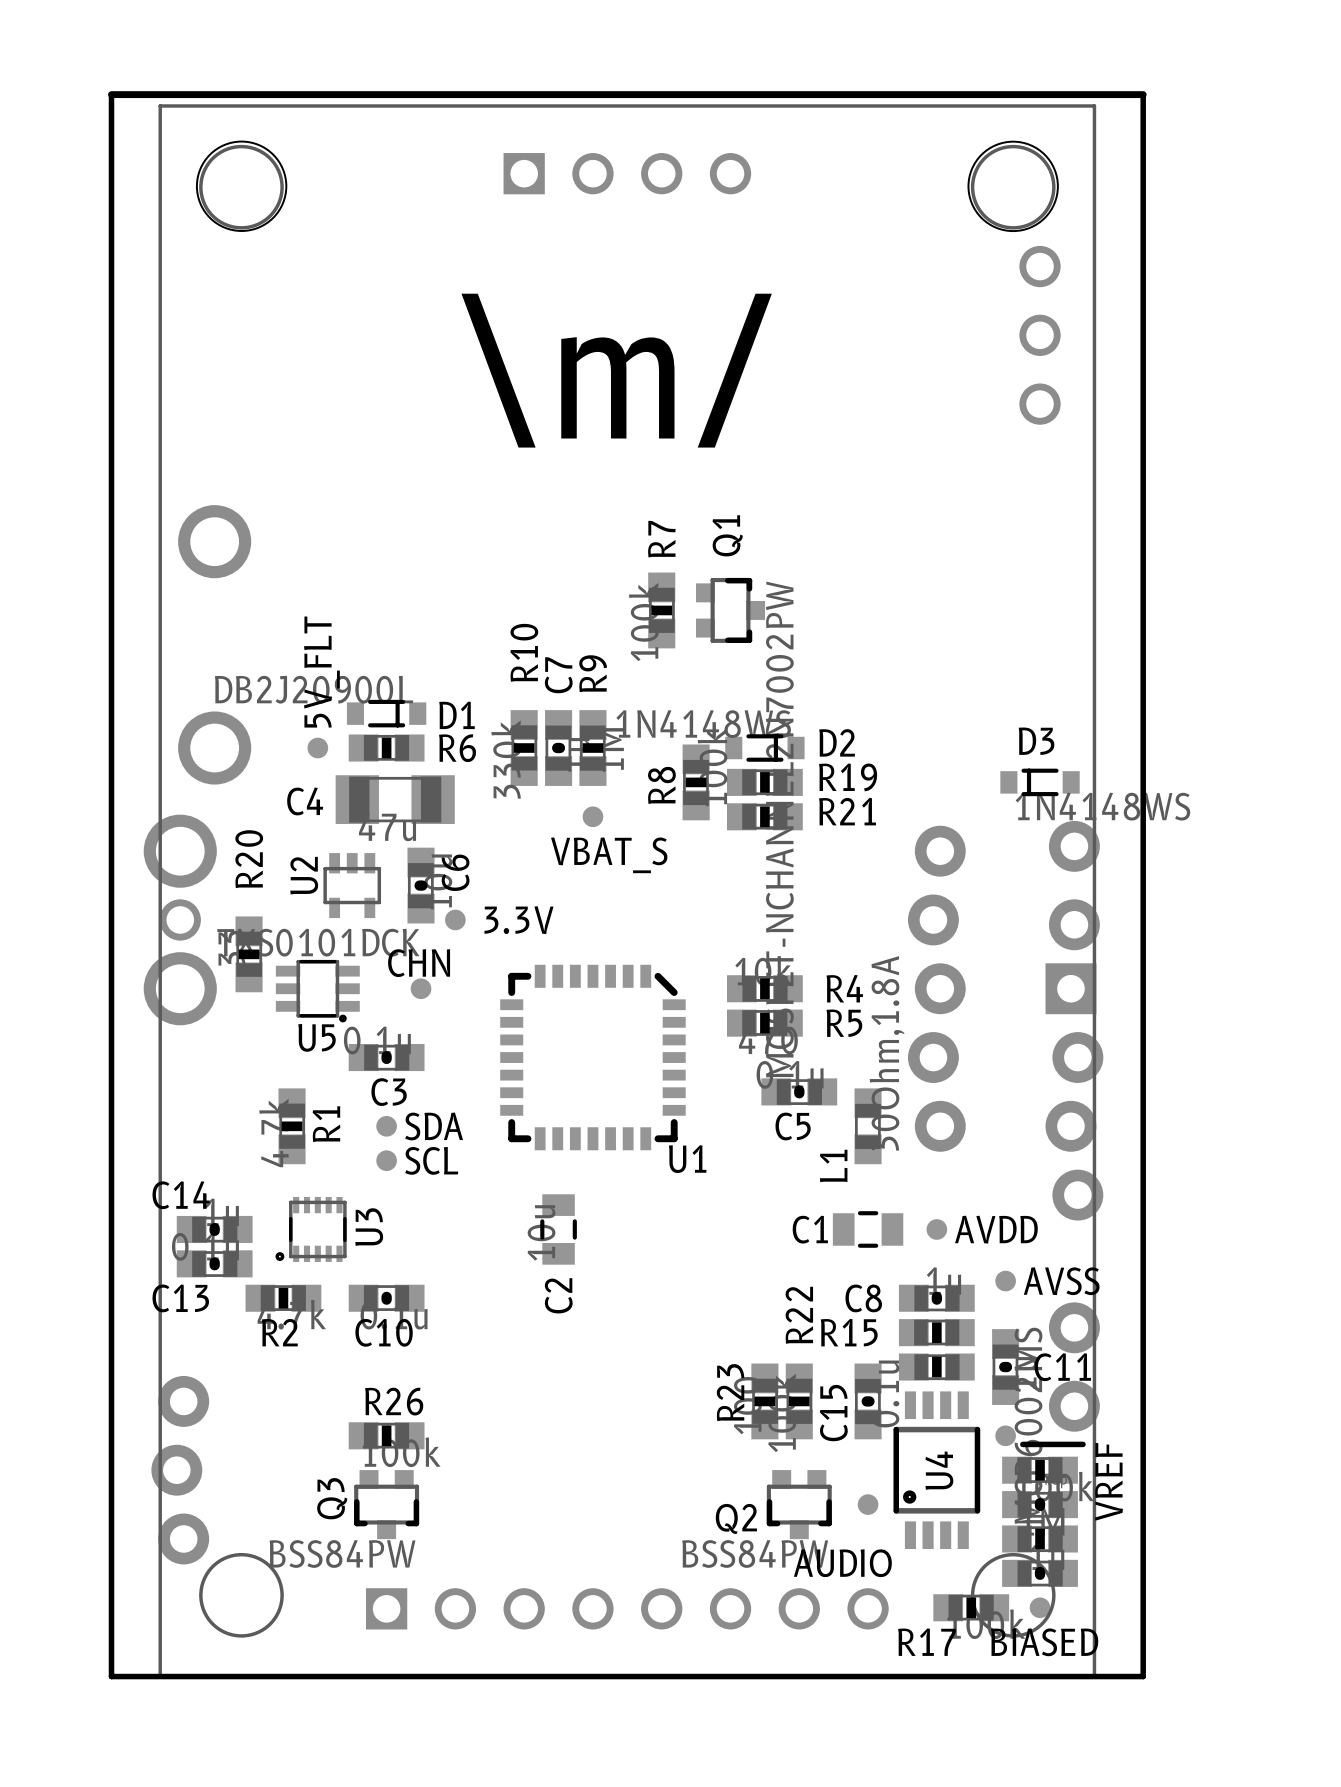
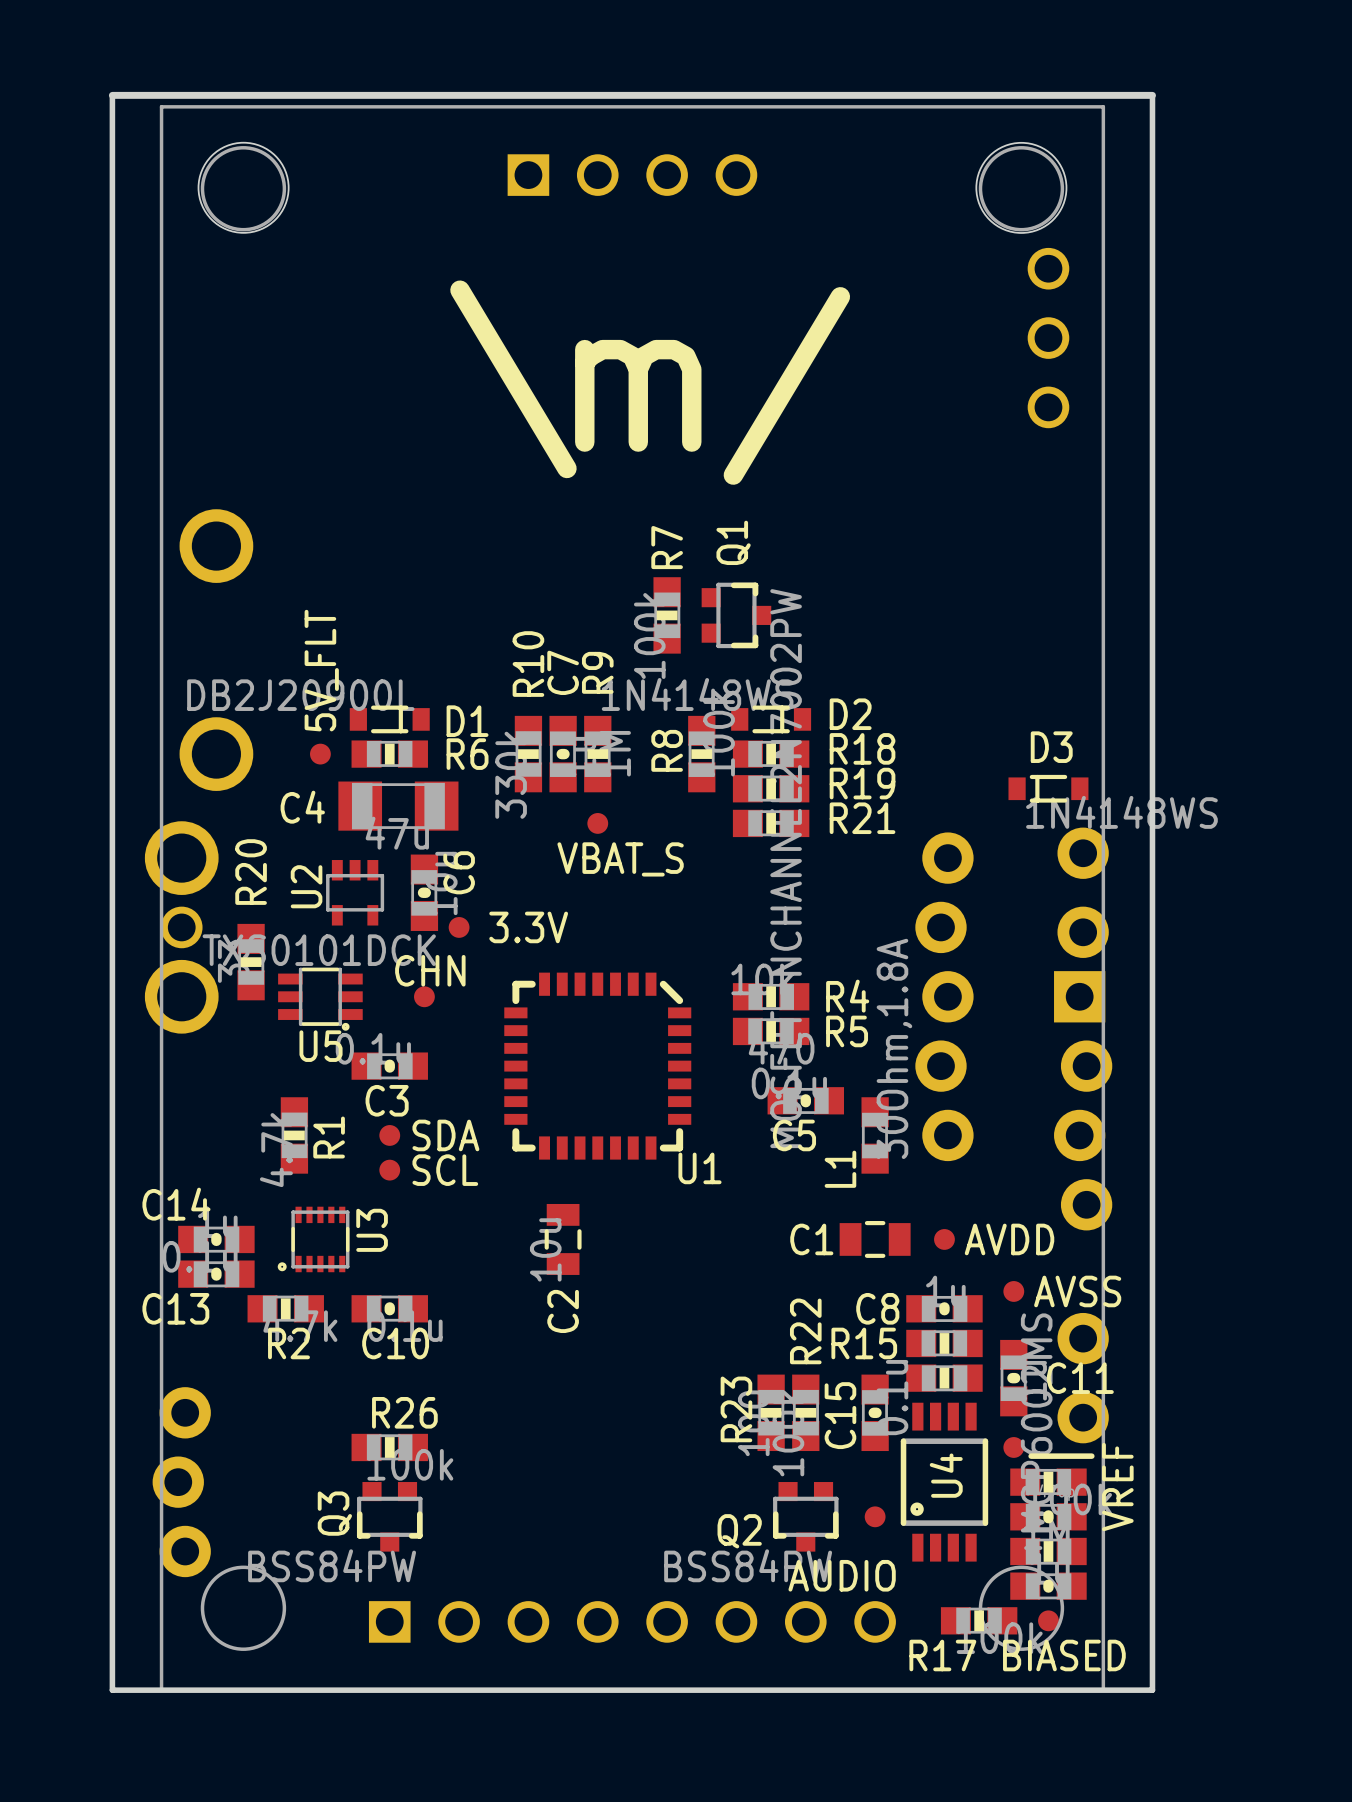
D2 position: (764, 748) -> (771, 719)
R18: none -> (771, 754)
R8 position: (696, 782) -> (701, 754)

